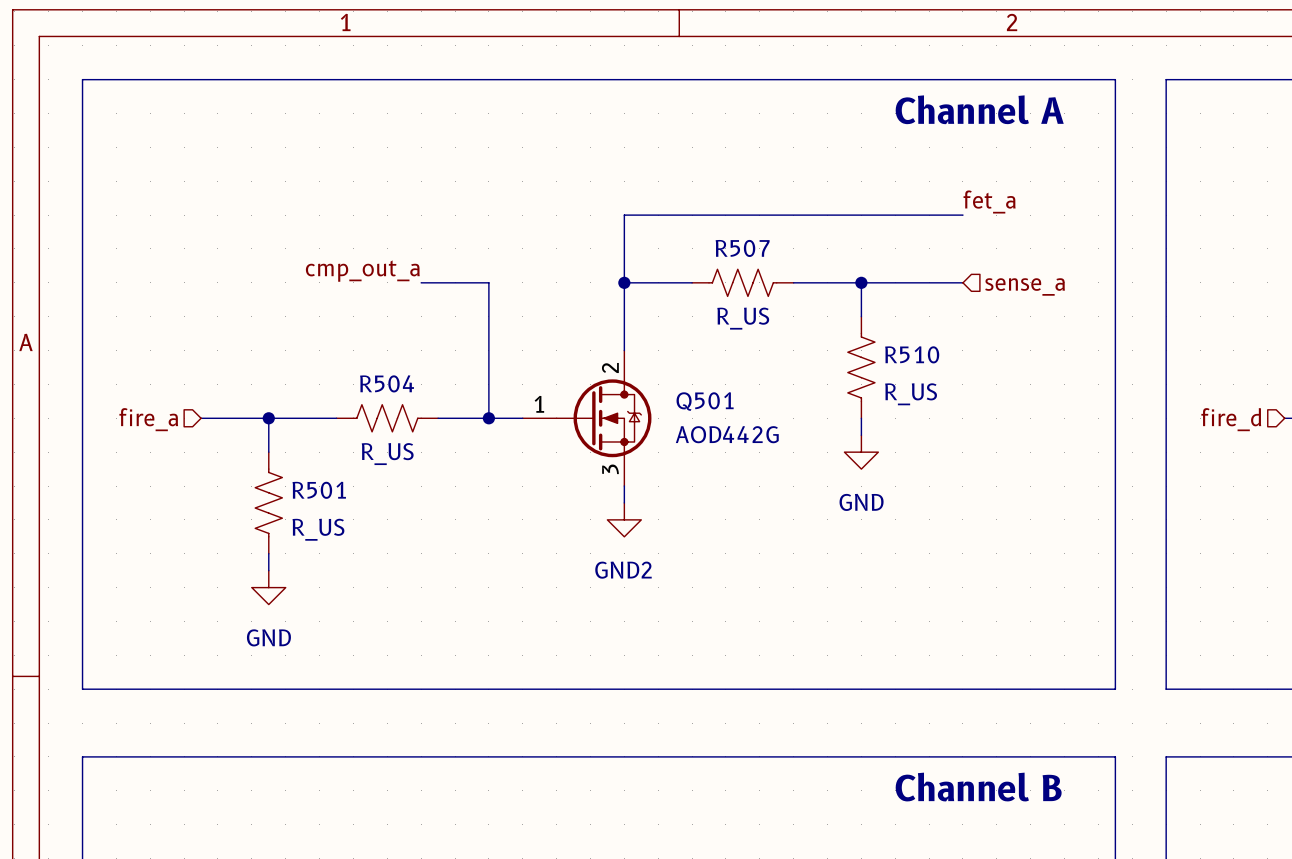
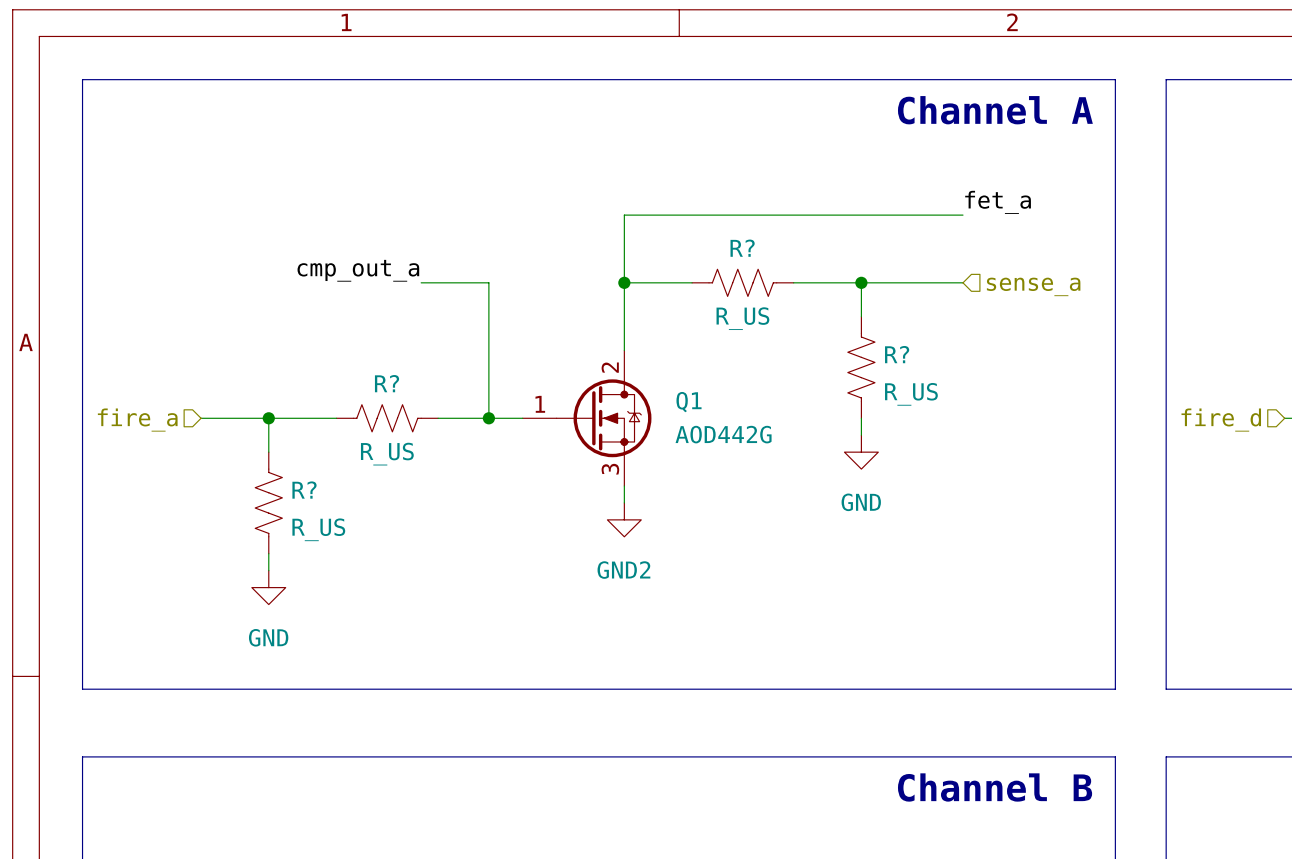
R507 name: R507 (742, 248) -> R? (742, 248)
R510 name: R510 (912, 354) -> R? (897, 354)
R504 name: R504 (387, 383) -> R? (387, 383)
Q501 name: Q501 (705, 401) -> Q1 (689, 402)
R501 name: R501 (319, 490) -> R? (304, 490)

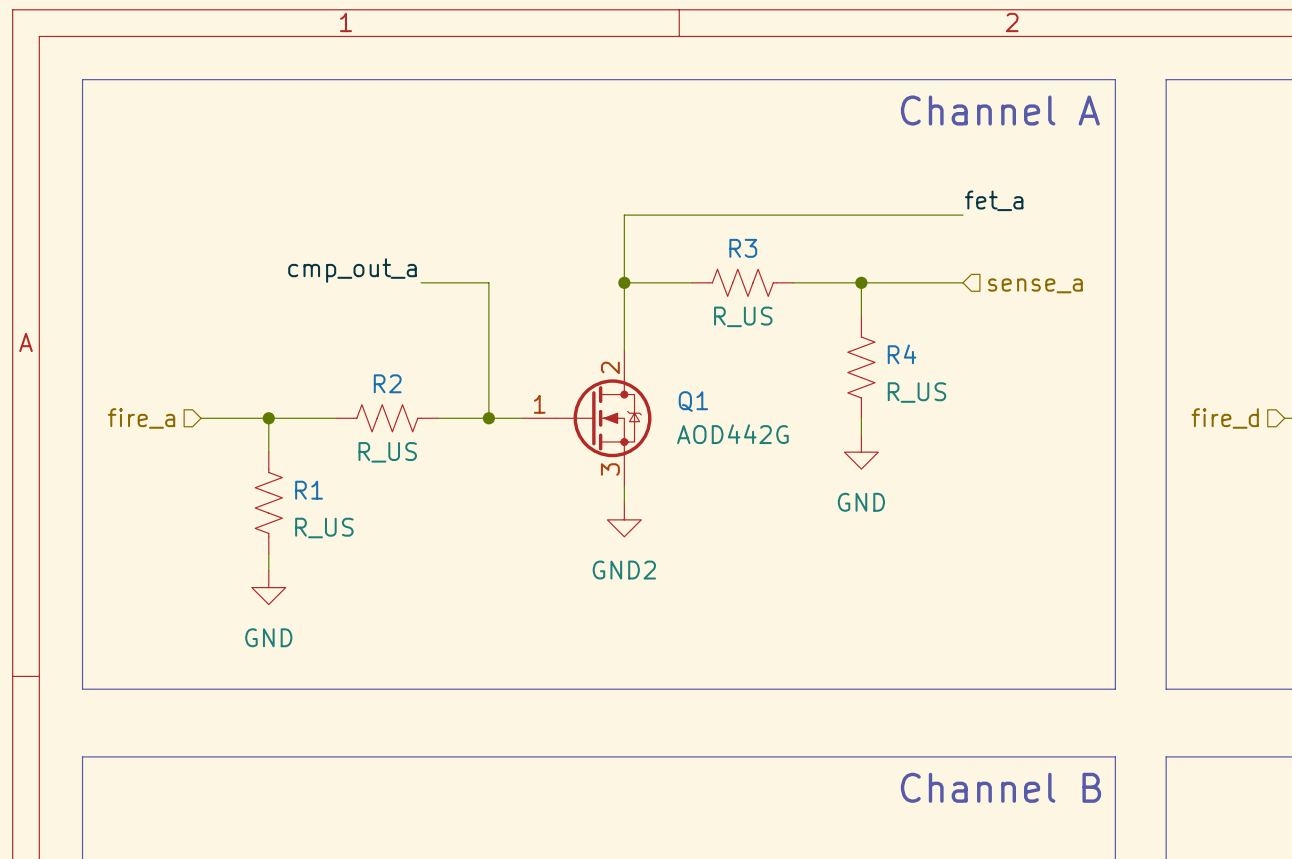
R? name: R? (742, 248) -> R3 (743, 248)
R? name: R? (897, 354) -> R4 (902, 354)
R? name: R? (387, 383) -> R2 (387, 383)
R? name: R? (304, 490) -> R1 (309, 490)

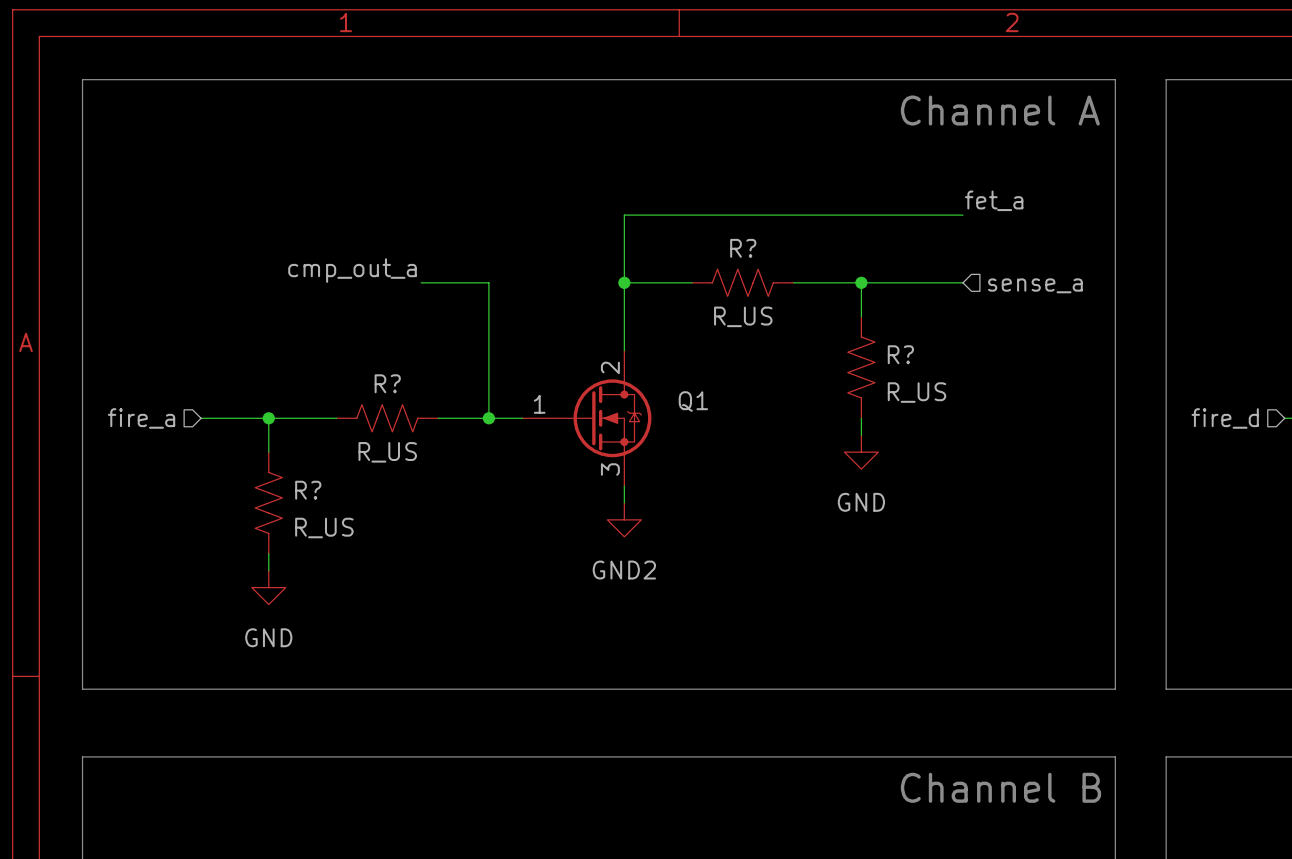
R3 name: R3 (743, 248) -> R? (743, 248)
R4 name: R4 (902, 354) -> R? (900, 354)
R2 name: R2 (387, 383) -> R? (387, 383)
Q1 value: AOD442G (732, 434) -> none
R1 name: R1 (309, 490) -> R? (308, 490)

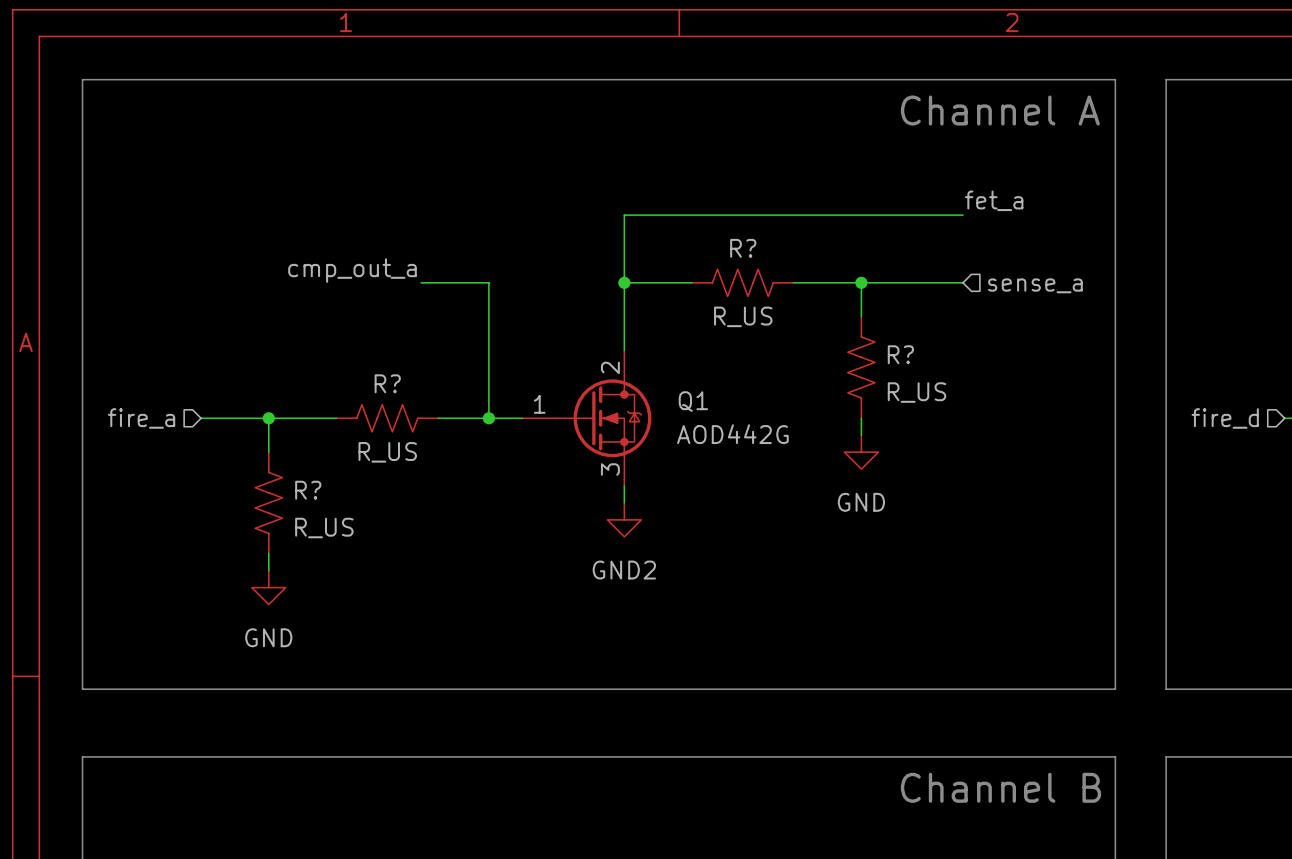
Q1 value: none -> AOD442G (732, 434)

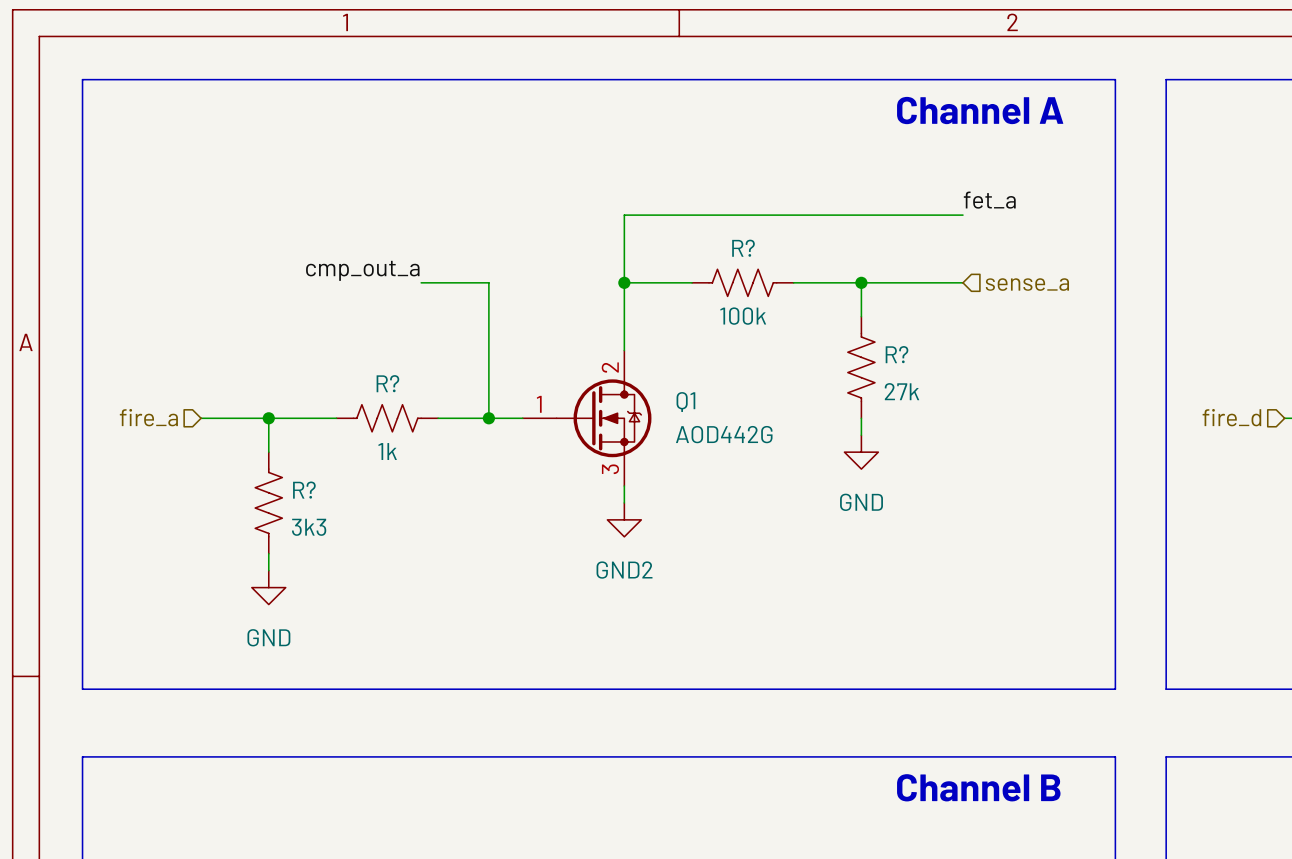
R? value: R_US (743, 316) -> 100k (743, 316)
R? value: R_US (916, 392) -> 27k (901, 391)
R? value: R_US (387, 452) -> 1k (387, 451)
R? value: R_US (324, 528) -> 3k3 (309, 527)

